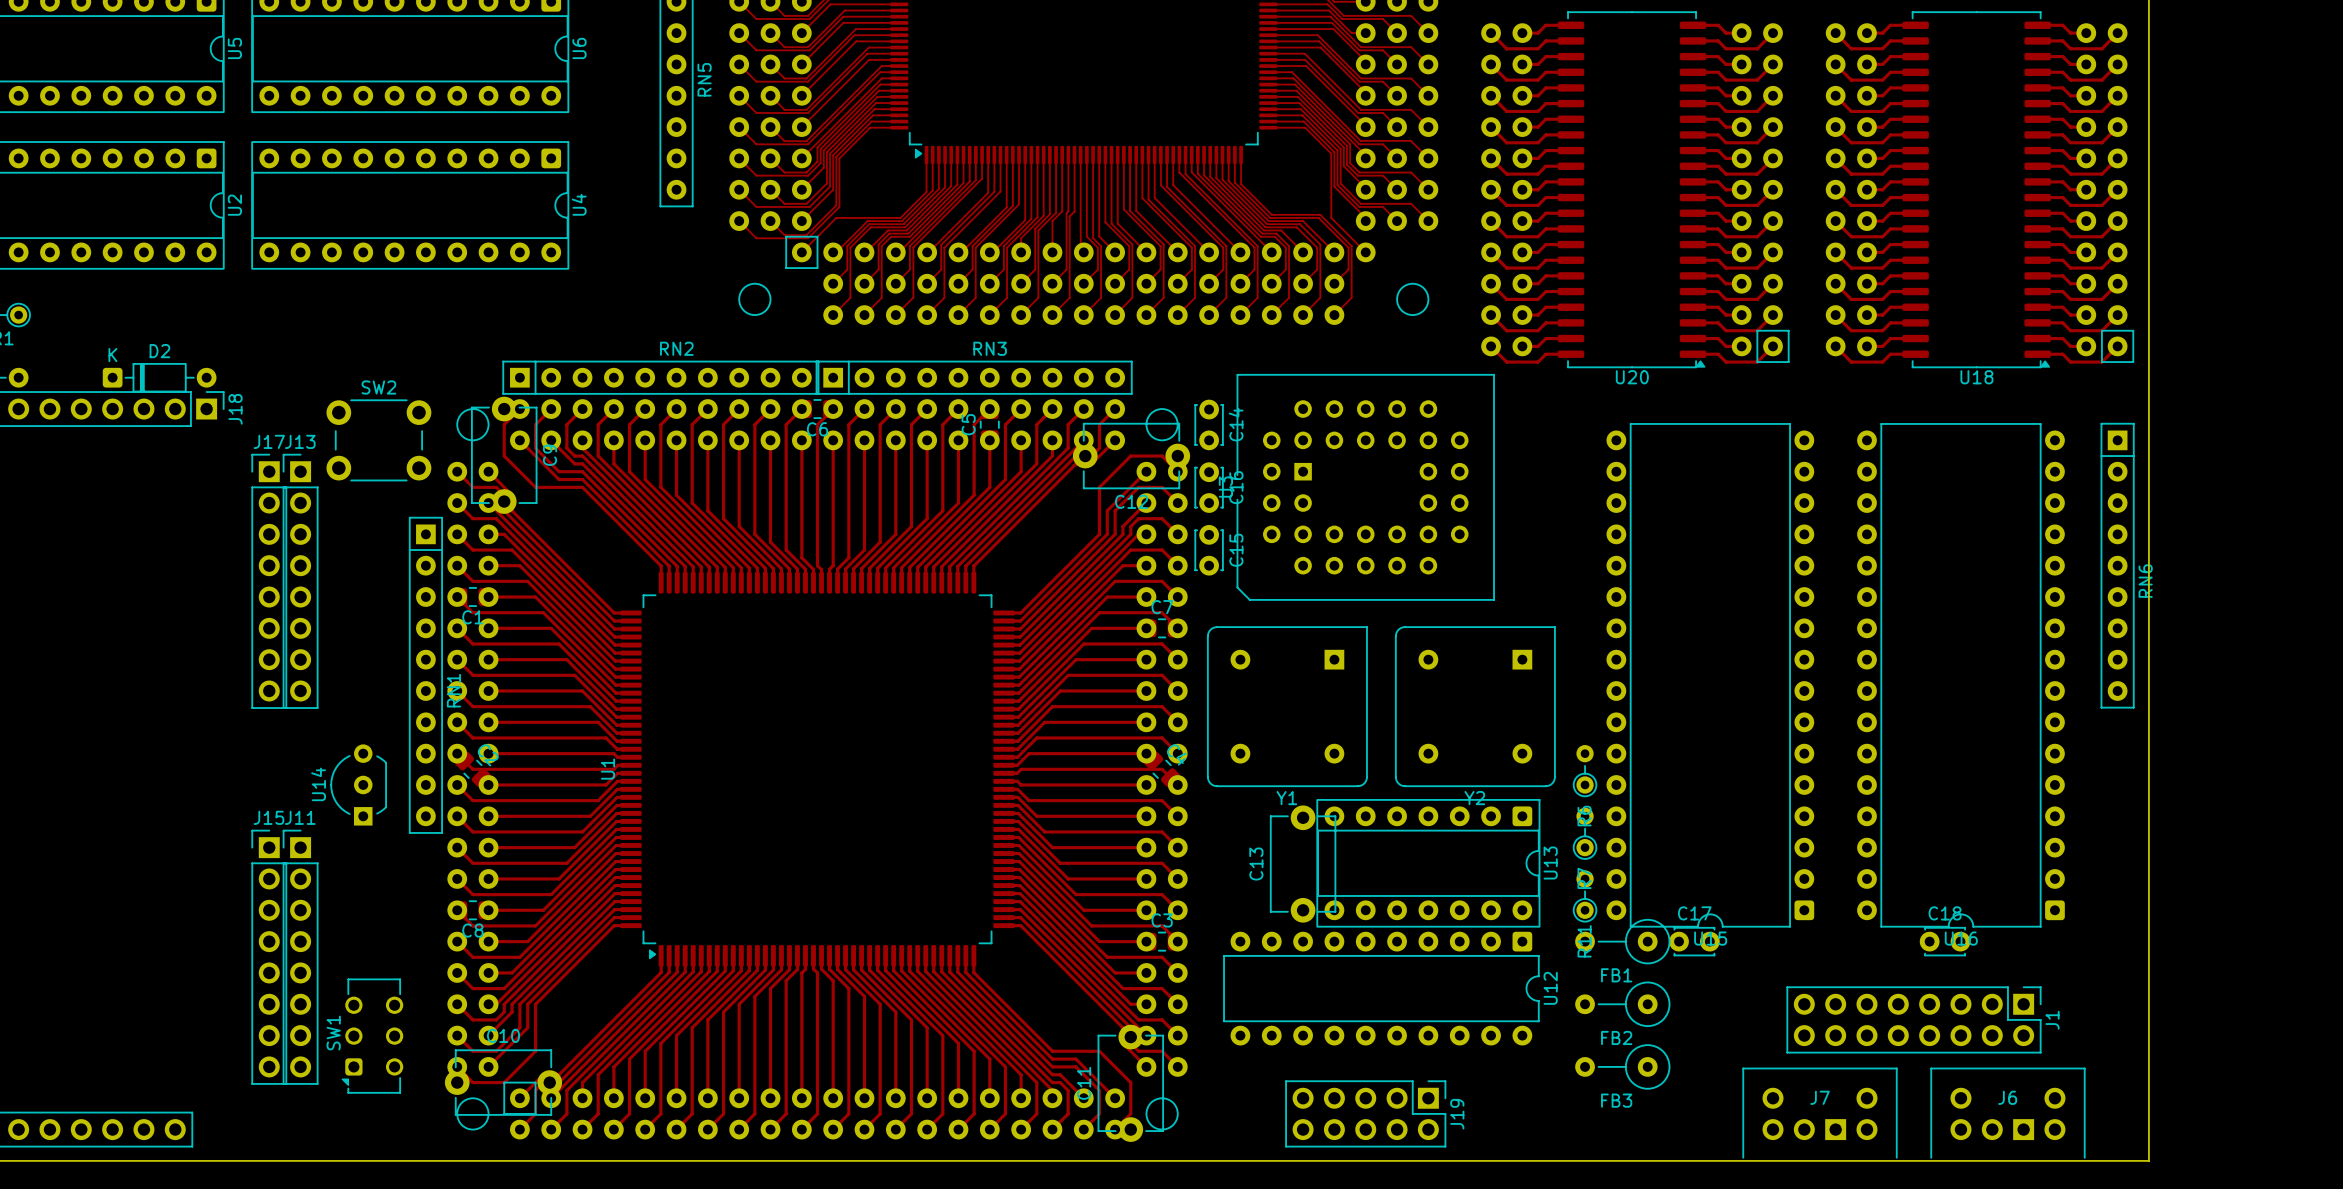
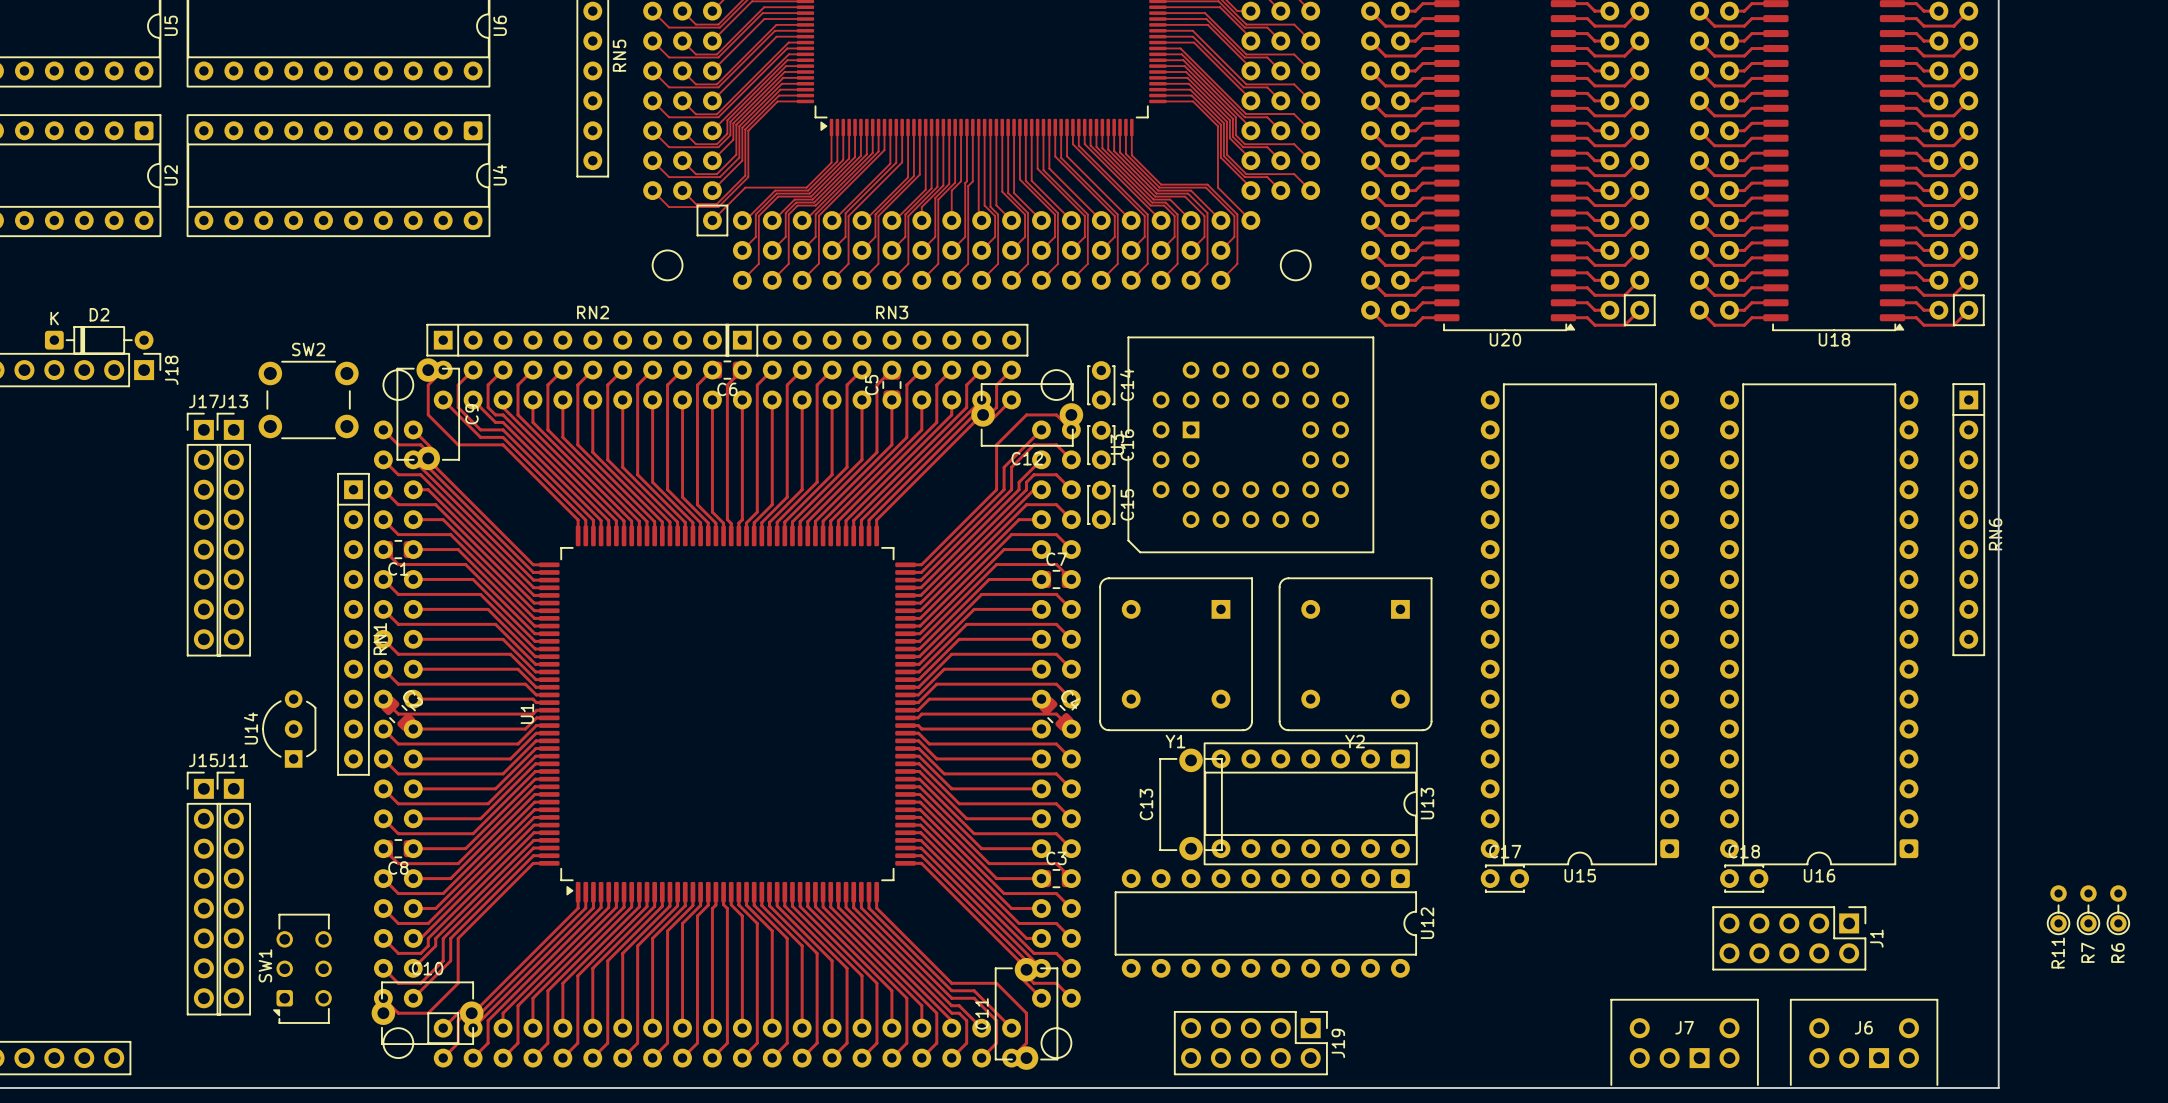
R6 position: (1585, 771) -> (2118, 910)
R7 position: (1585, 833) -> (2088, 910)
R11 position: (1585, 896) -> (2058, 910)
FB1: (1622, 941) -> none
C17 position: (1694, 941) -> (1504, 878)
C18 position: (1945, 941) -> (1744, 878)
J1 footprint: [1786, 986, 2042, 1054] -> [1712, 906, 1867, 971]
FB2: (1622, 1004) -> none
J1 name position: J1 (2052, 1020) -> J1 (1876, 938)
FB3: (1622, 1066) -> none

